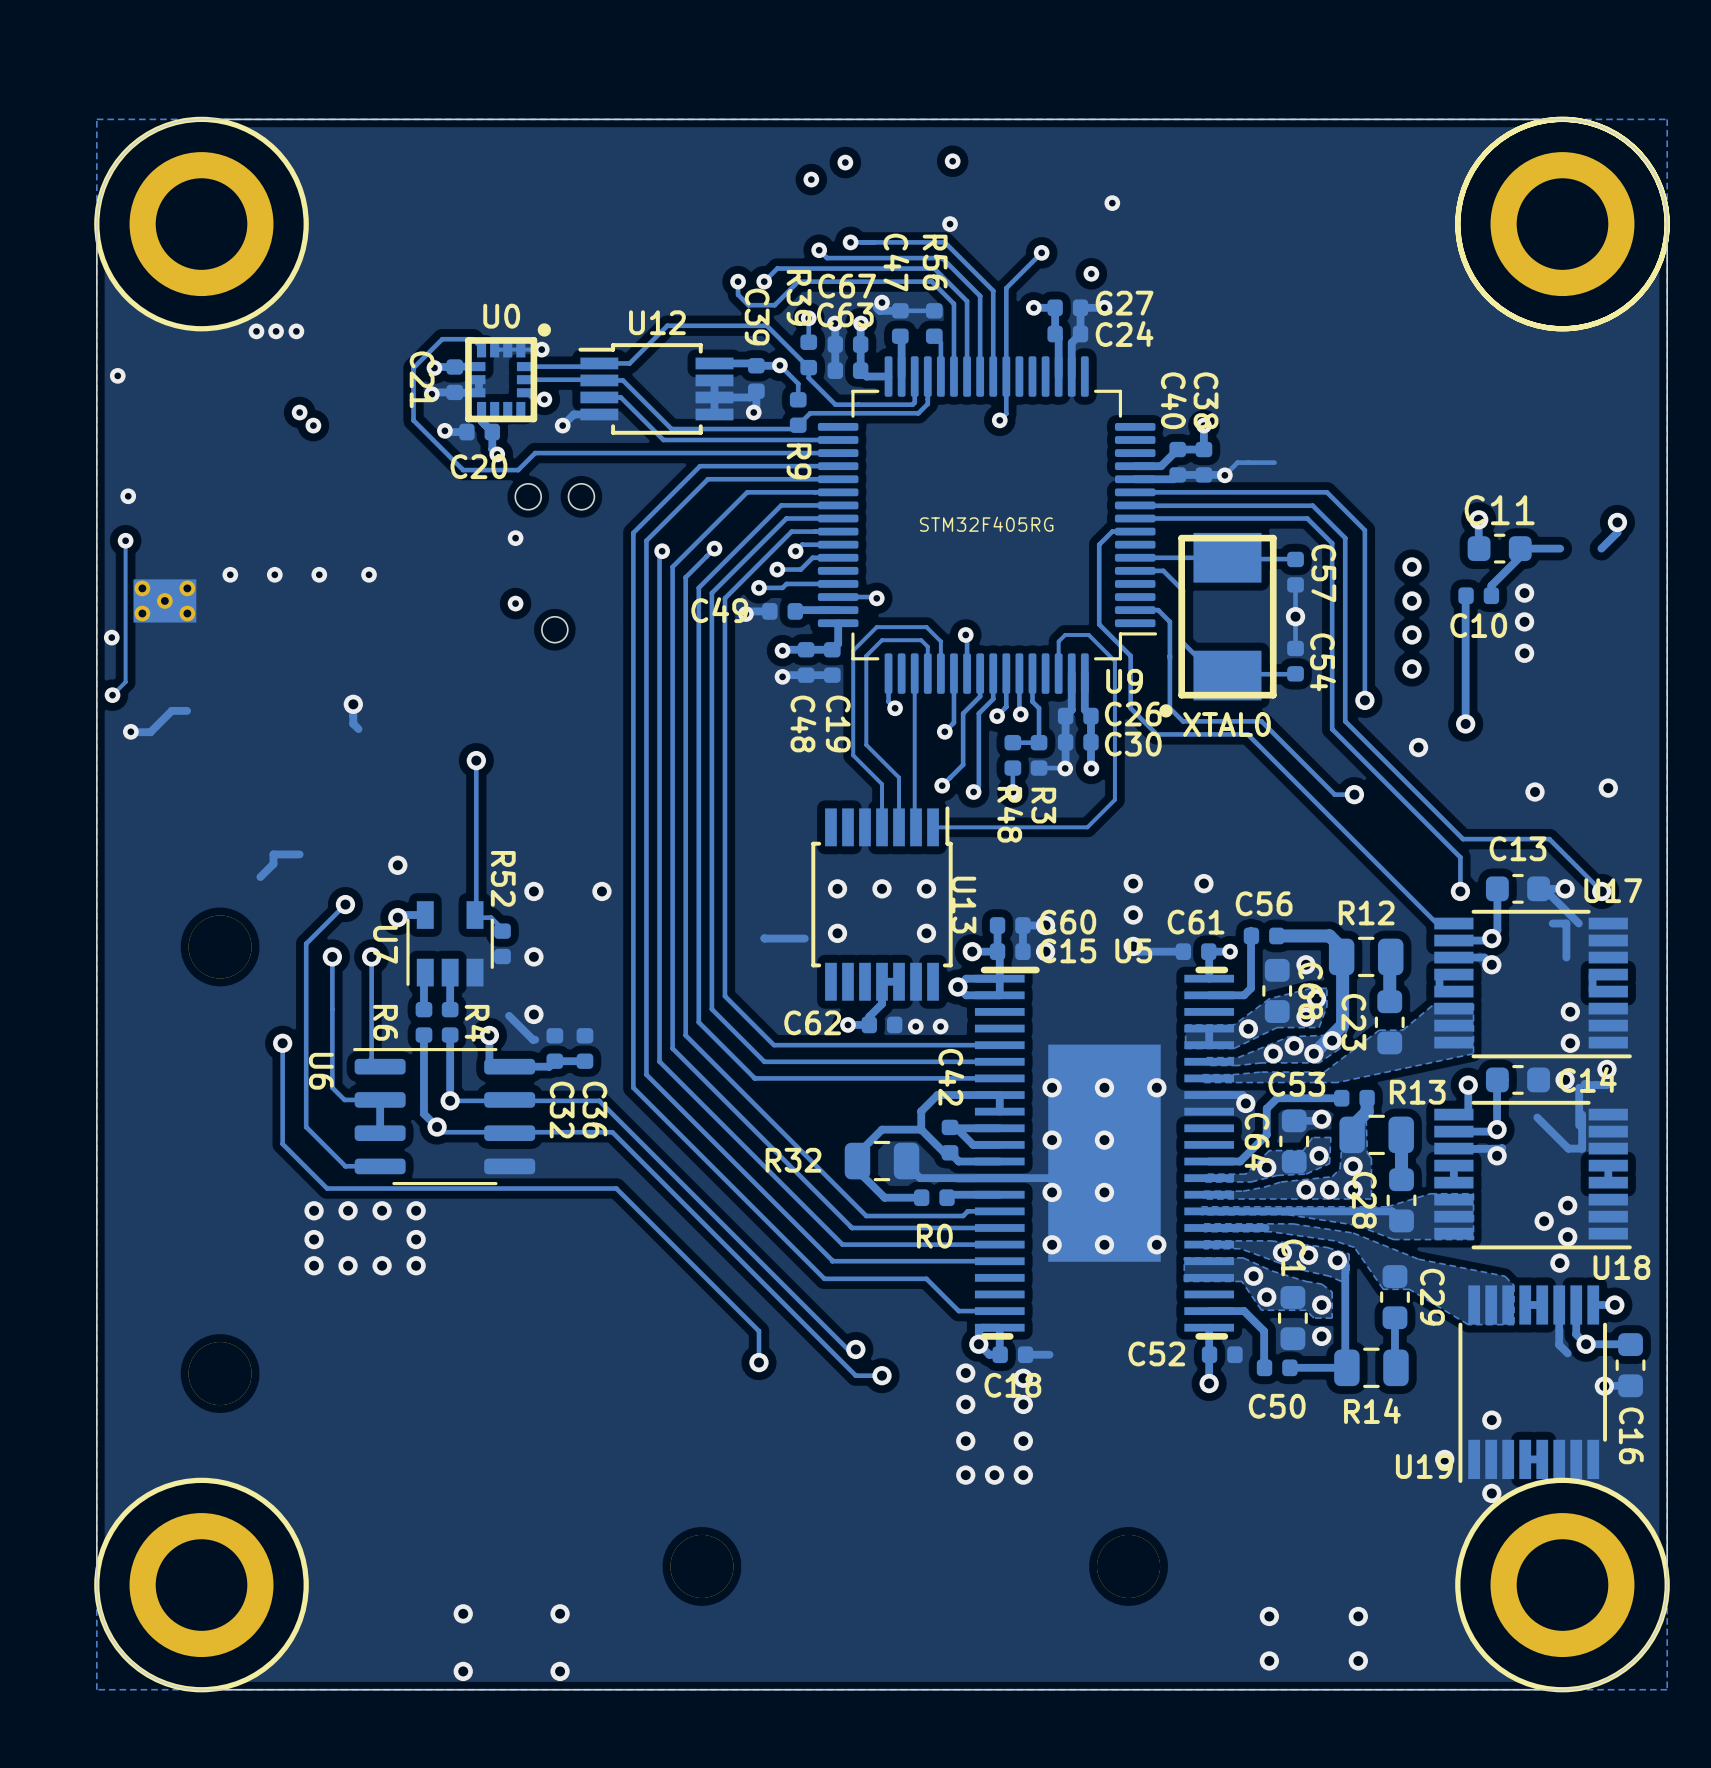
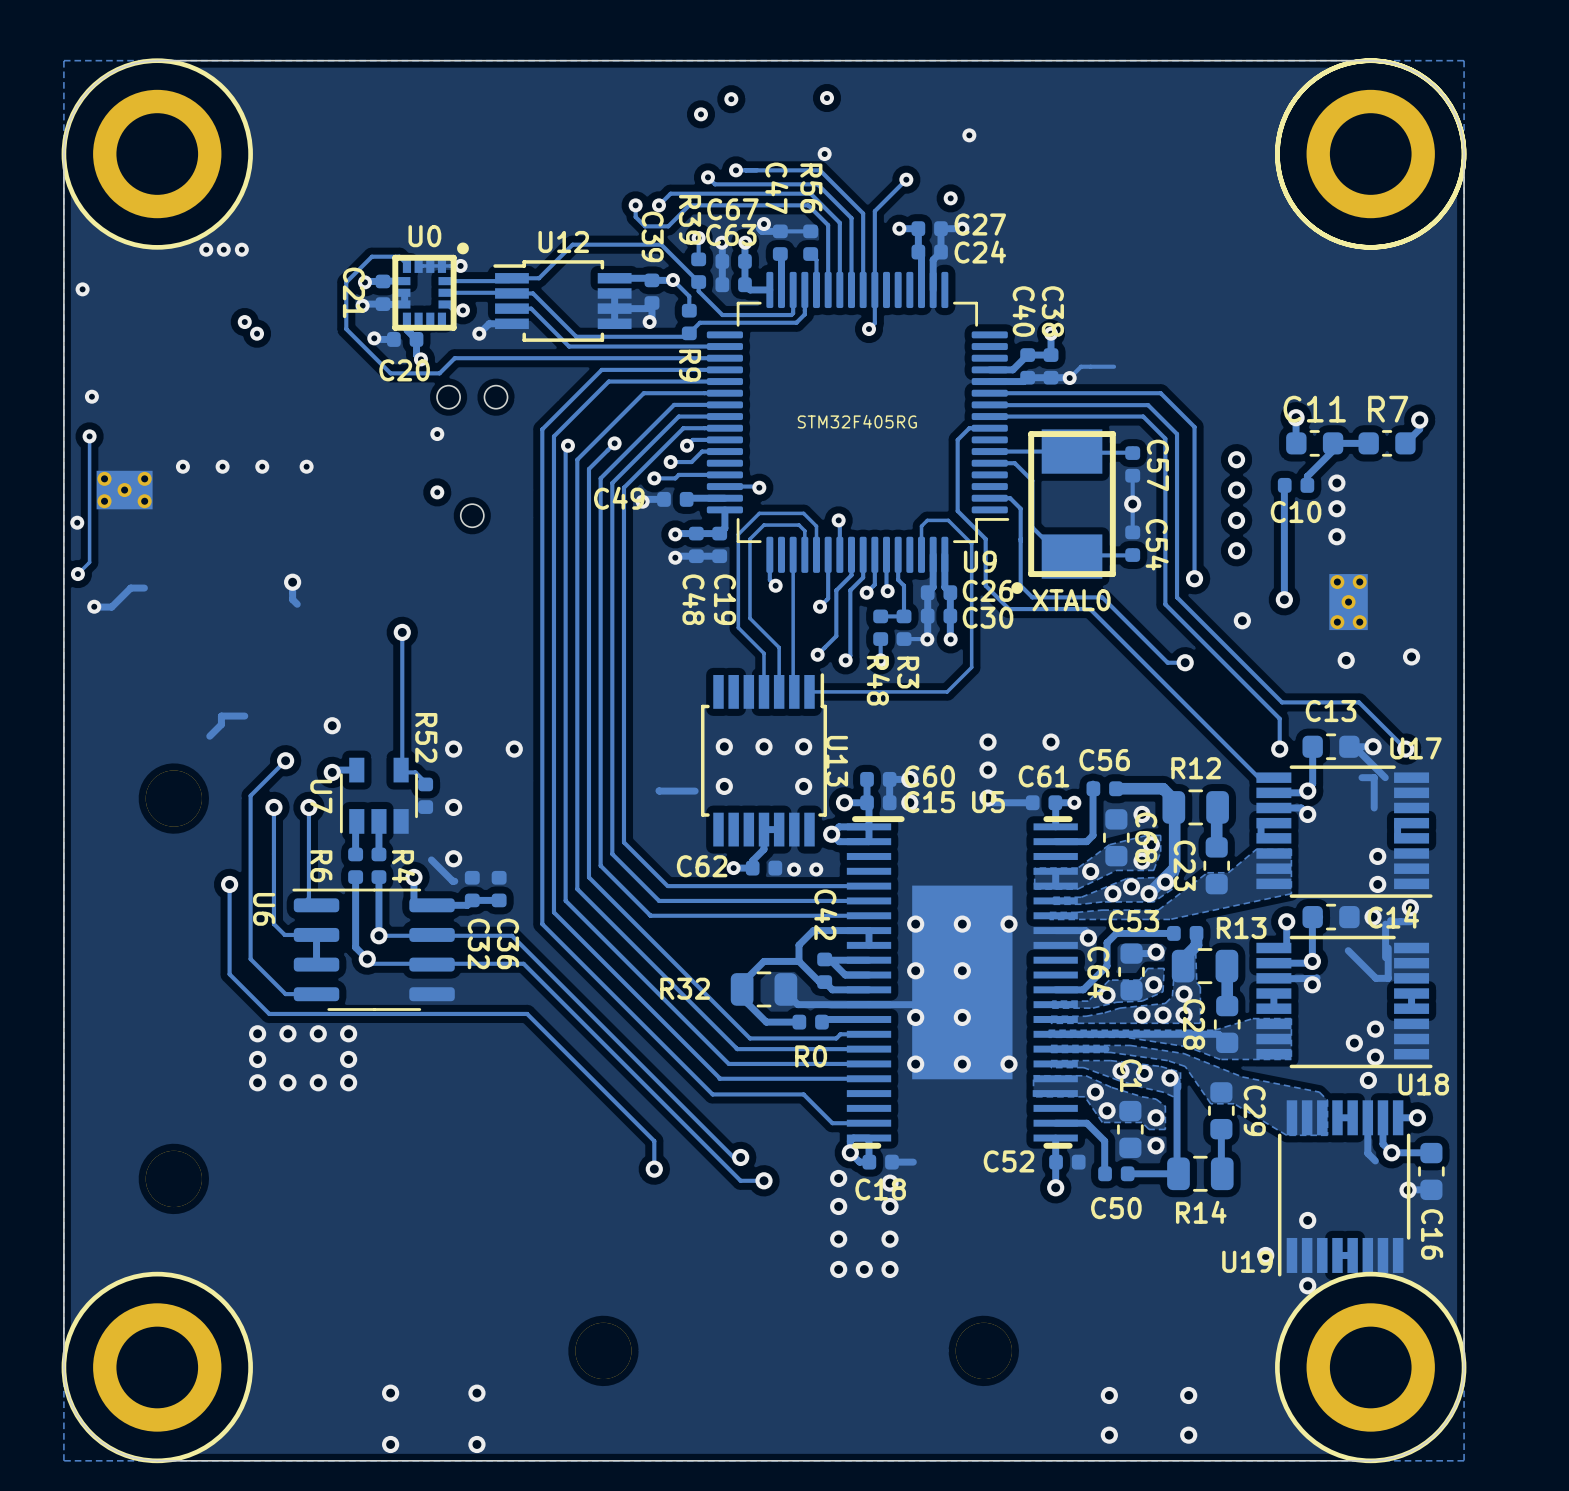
R7: none -> (1387, 443)
part: none -> (1348, 602)

